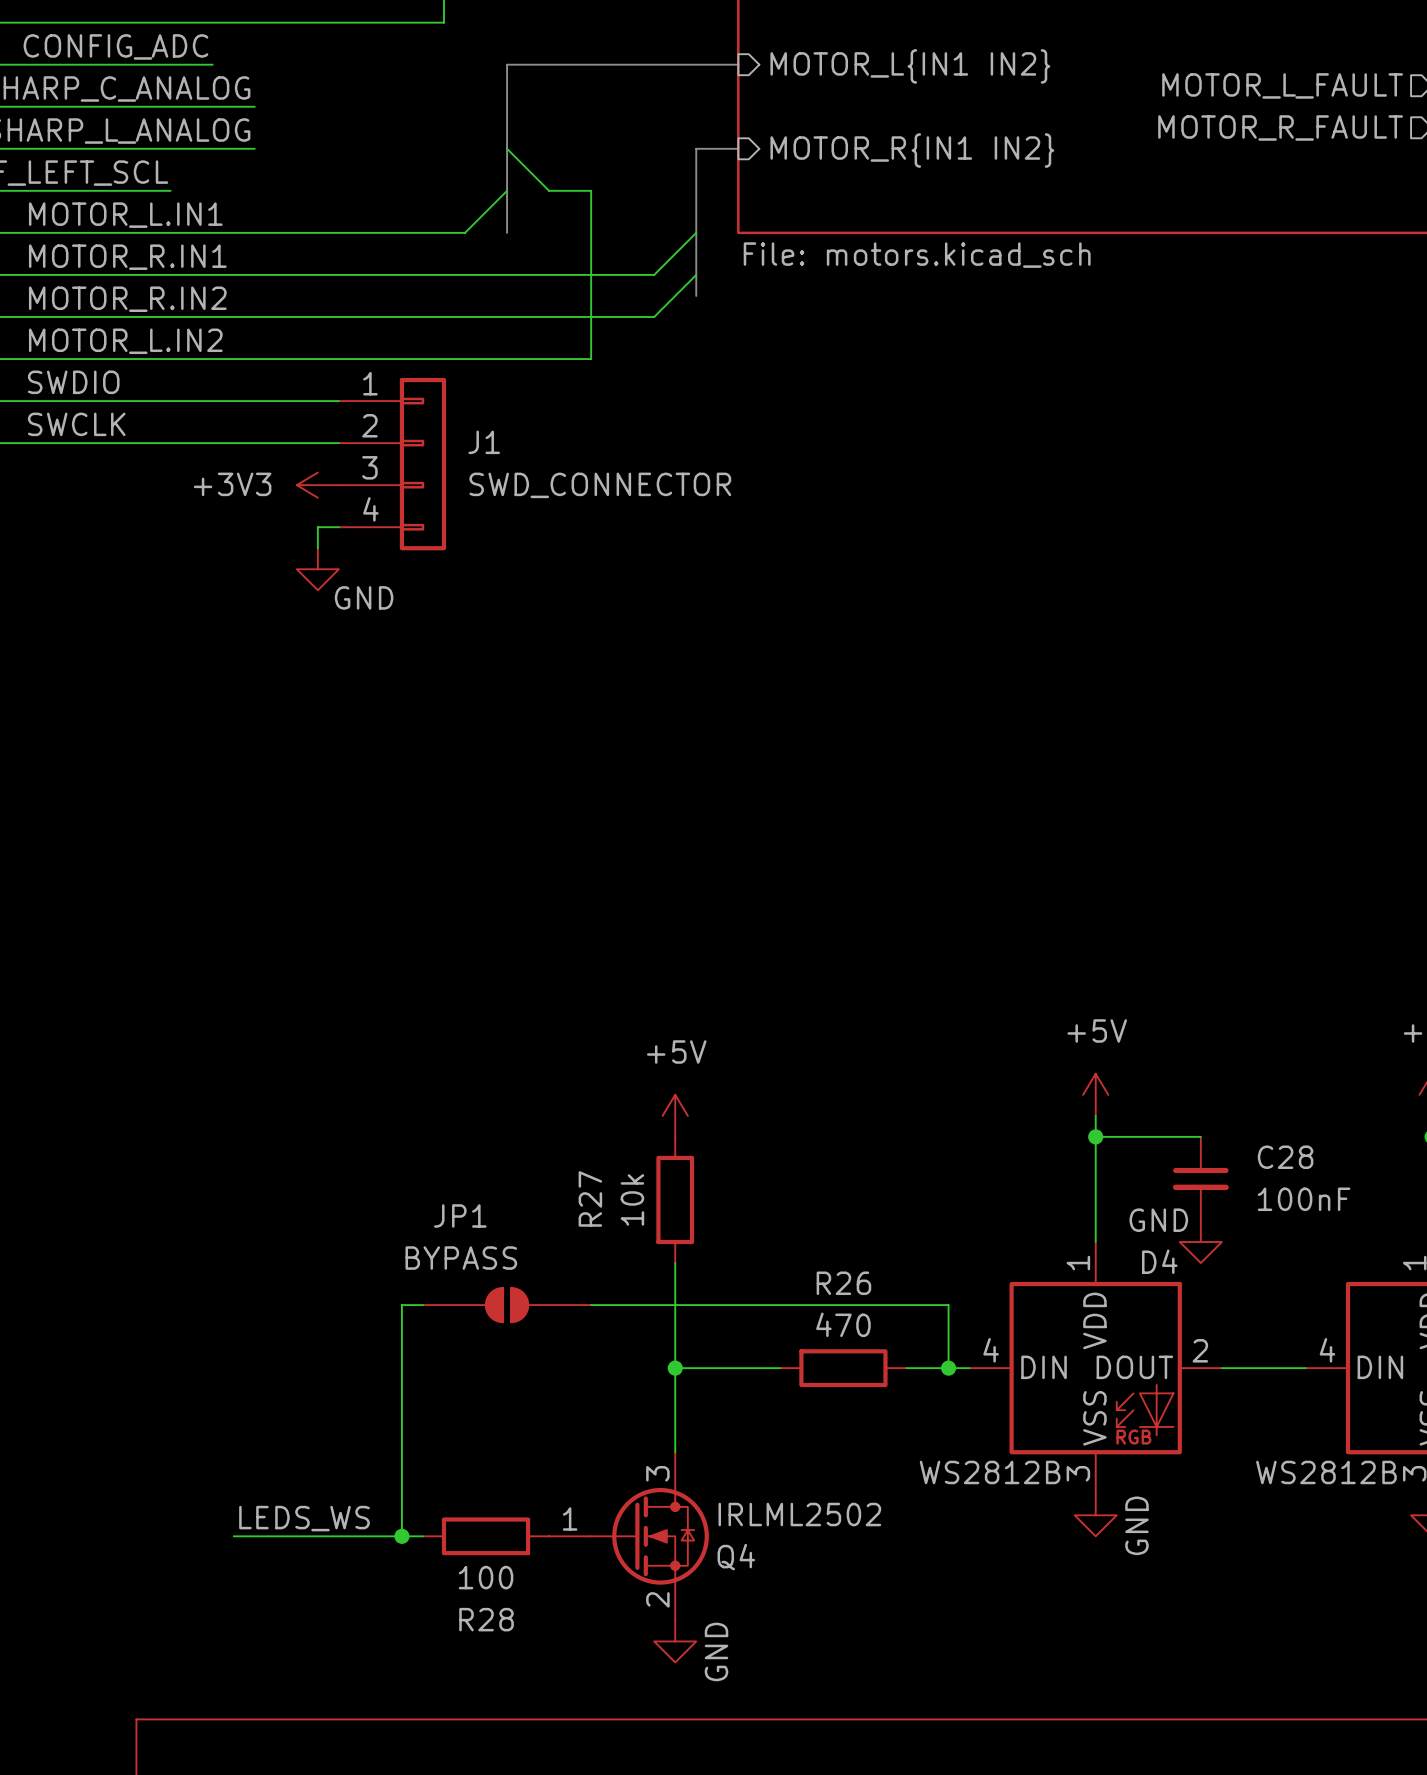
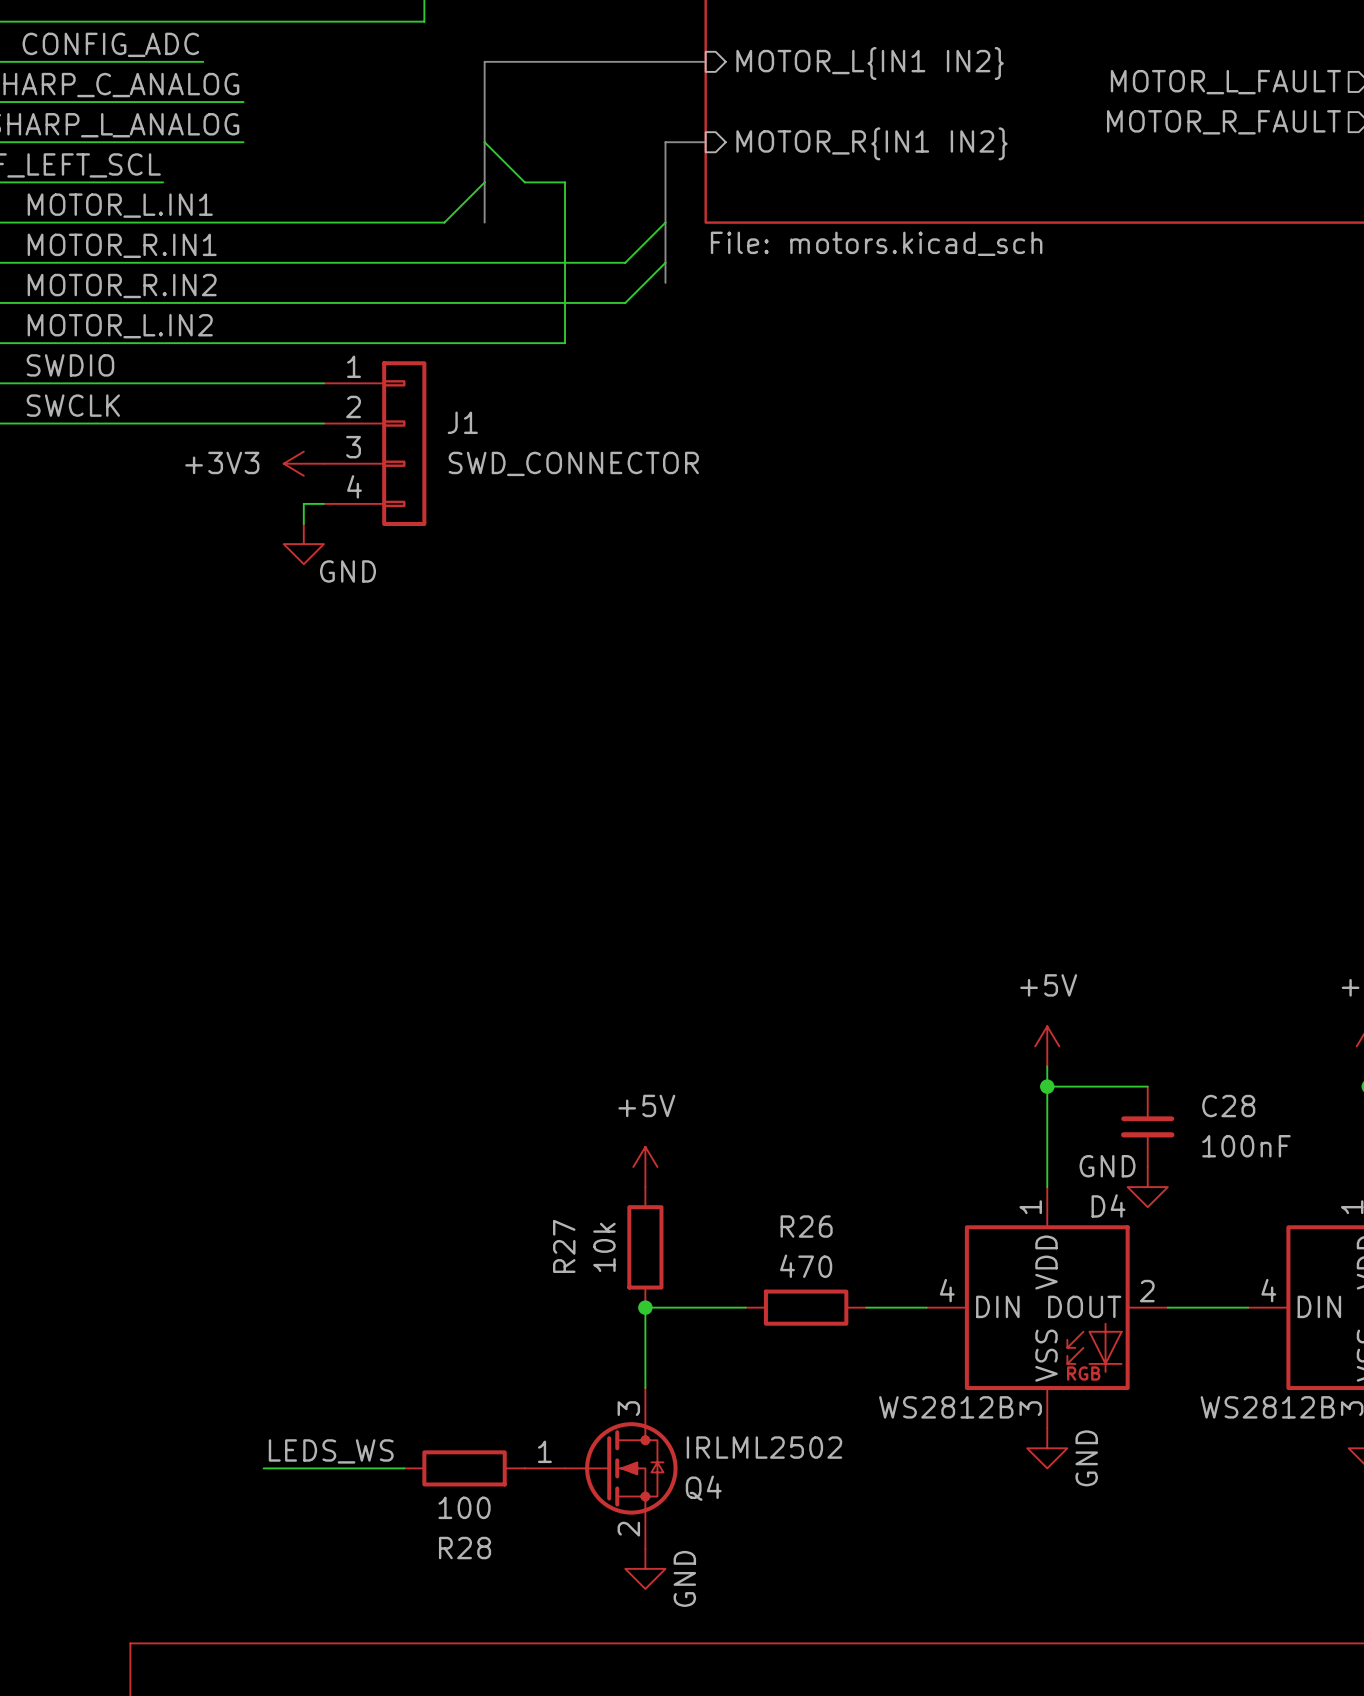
power symbol position: +5V (675, 1115) -> +5V (645, 1166)
R27 position: (675, 1199) -> (645, 1247)
wire: (675, 1263) (675, 1368) -> none
wire: (422, 1305) (401, 1305) (401, 1536) -> none
JP1: BYPASS (507, 1305) -> none
wire: (591, 1305) (948, 1305) (948, 1368) -> none
junction: (948, 1368) -> none
label position: LEDS_WS (304, 1518) -> LEDS_WS (331, 1451)
wire: (233, 1536) (275, 1536) -> none
junction: (401, 1536) -> none

